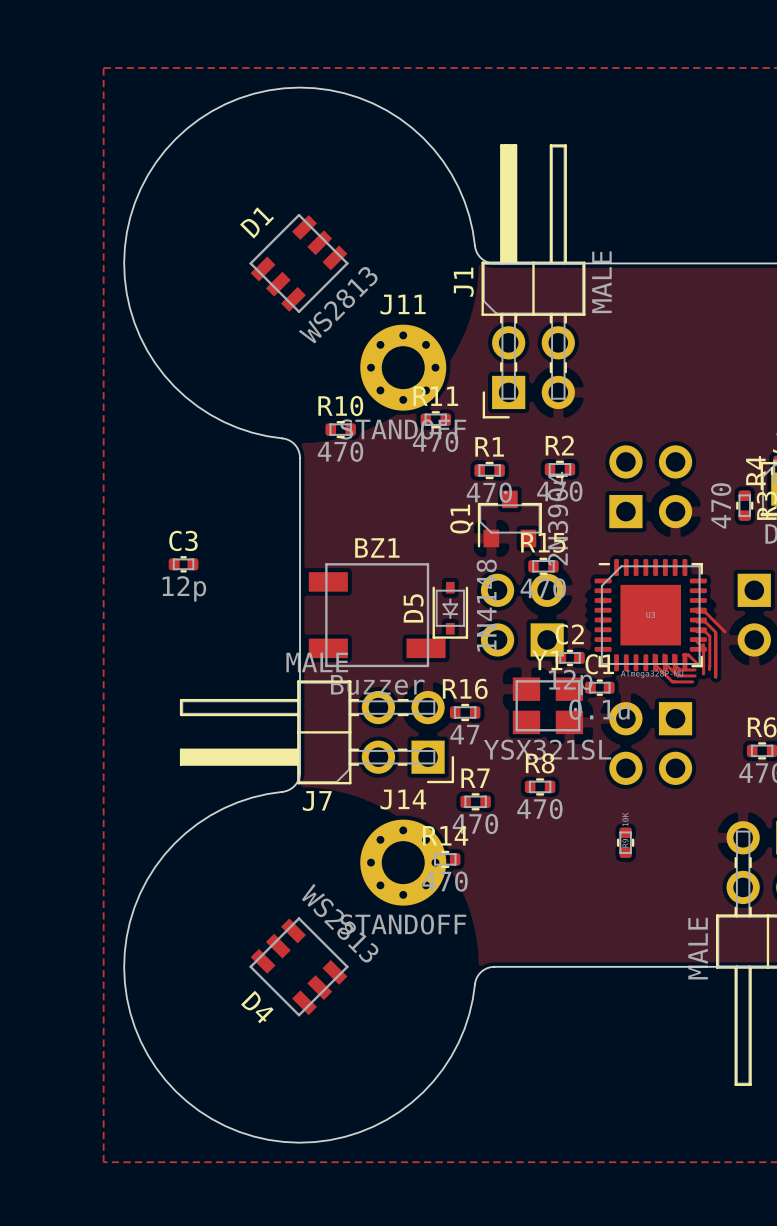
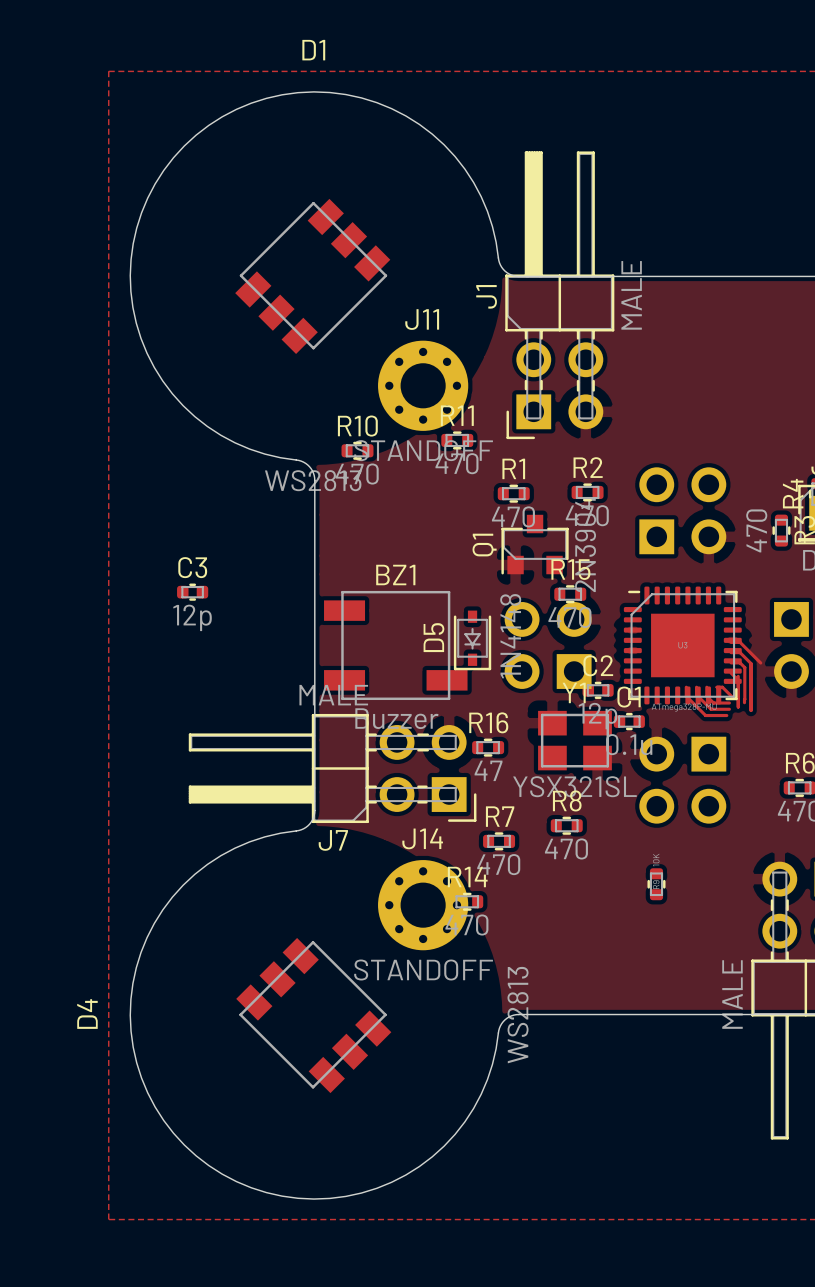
D1 footprint: [249, 213, 349, 313] -> [235, 198, 391, 354]
D1 name position: D1 (257, 222) -> D1 (313, 50)
D1 value position: WS2813 (338, 305) -> WS2813 (313, 480)
D4 footprint: [249, 917, 349, 1017] -> [236, 937, 392, 1094]
D4 value position: WS2813 (340, 923) -> WS2813 (518, 1015)
D4 name position: D4 (257, 1007) -> D4 (87, 1014)

